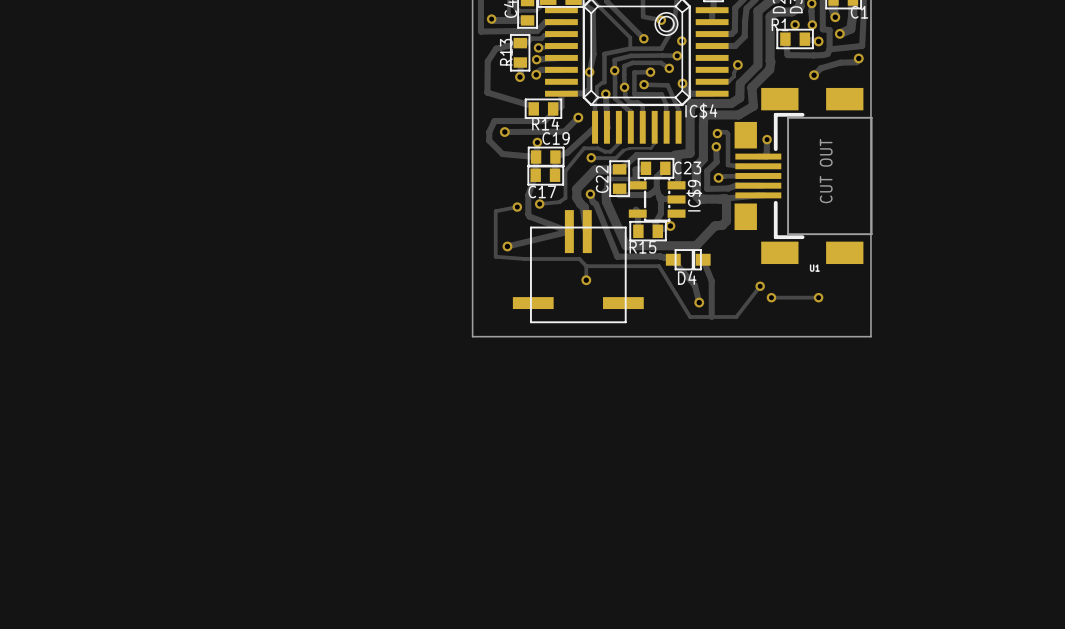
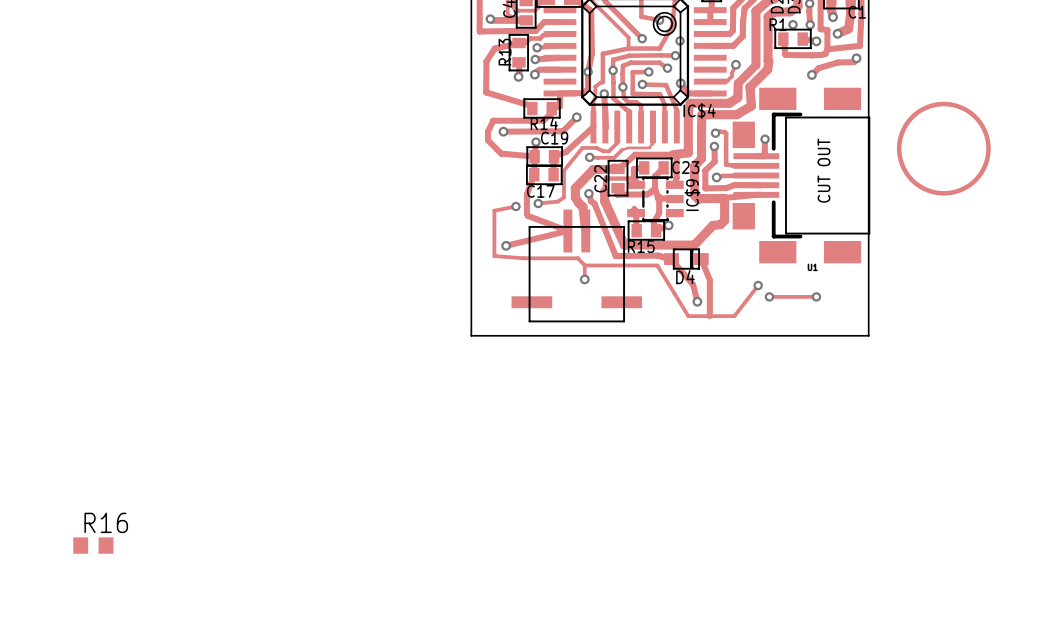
drawing: none -> [896, 101, 991, 196]
R16: none -> (93, 545)

